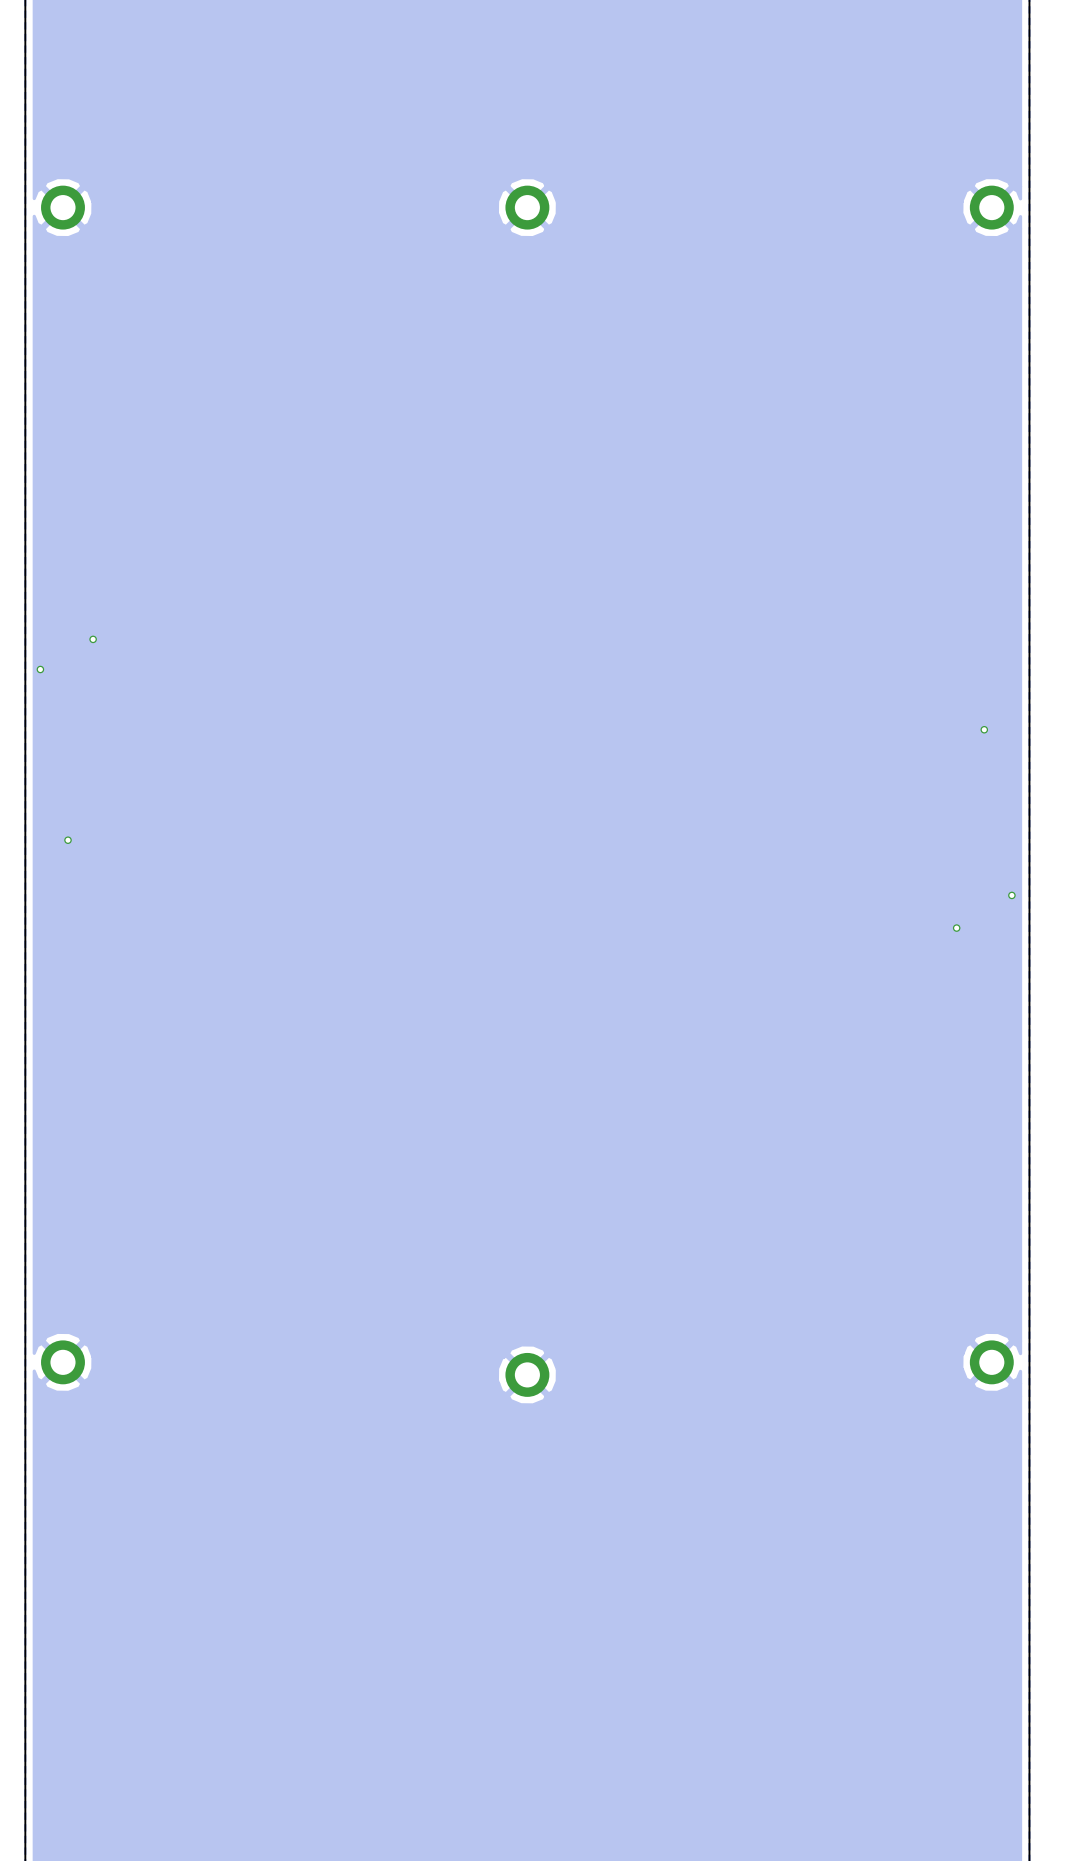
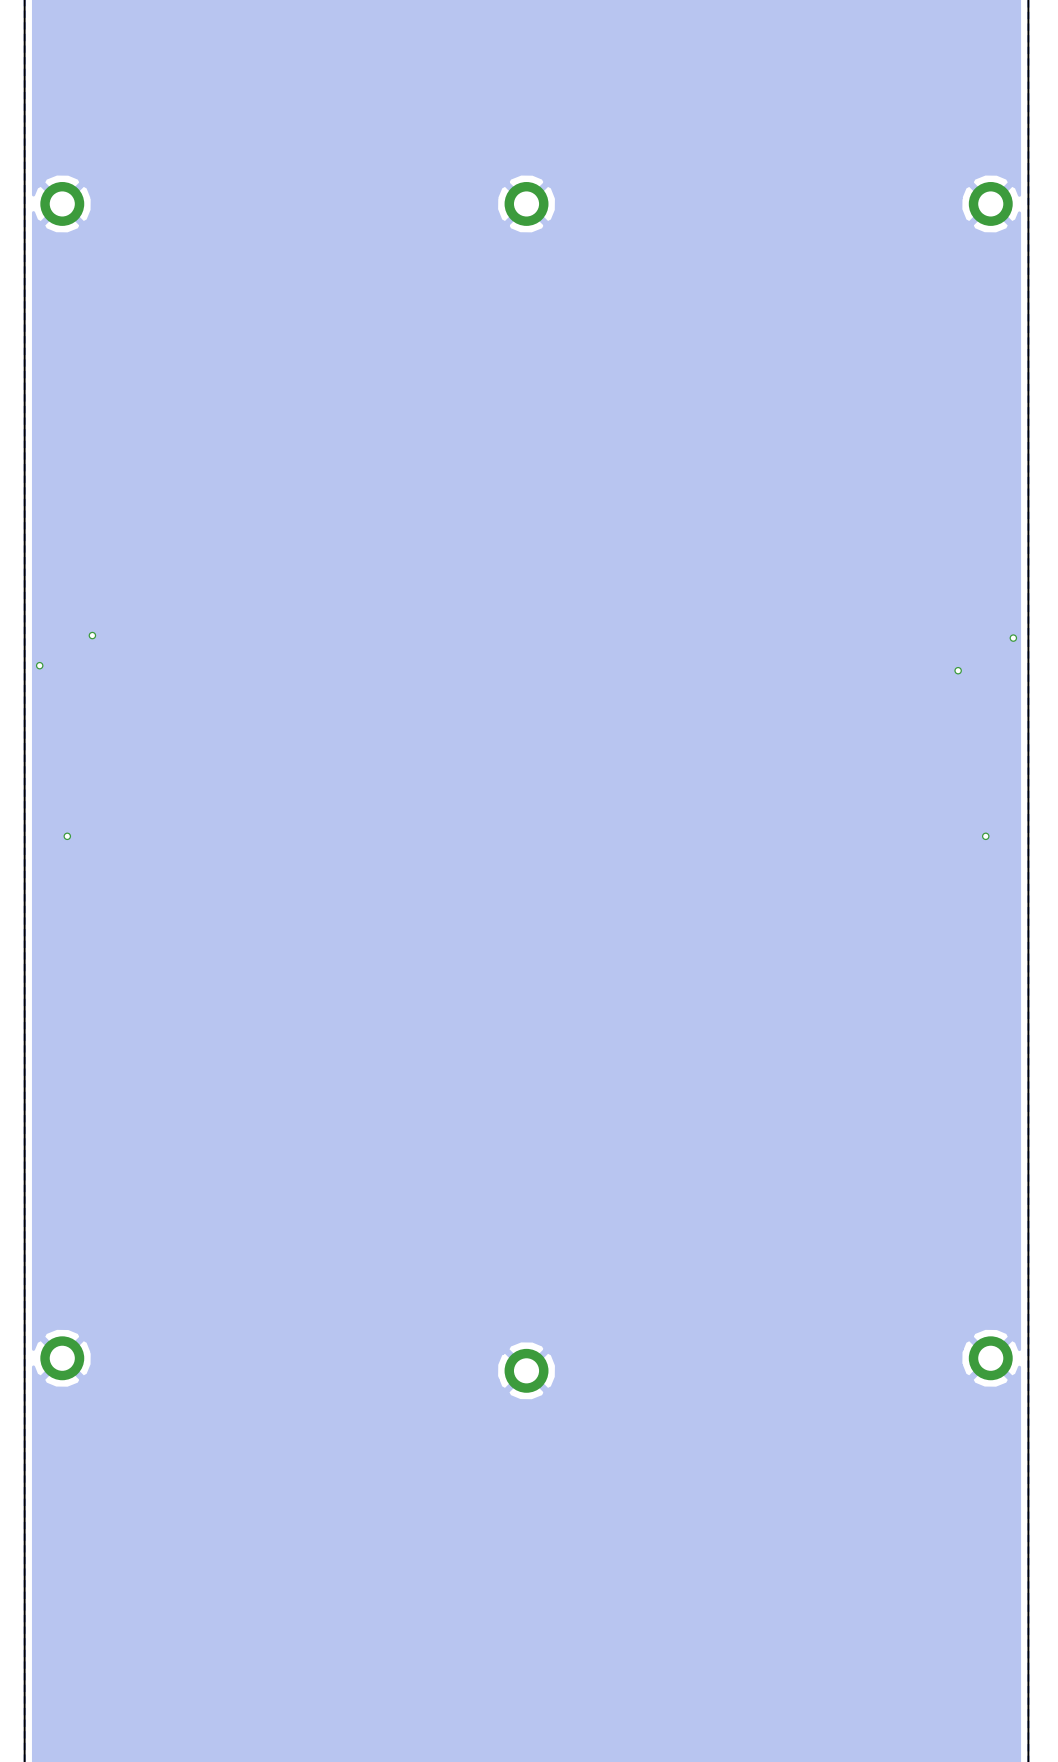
via: none -> (1013, 638)
via: none -> (958, 670)
via: (984, 729) -> none
via: none -> (985, 836)
via: (1011, 895) -> none
via: (956, 928) -> none

